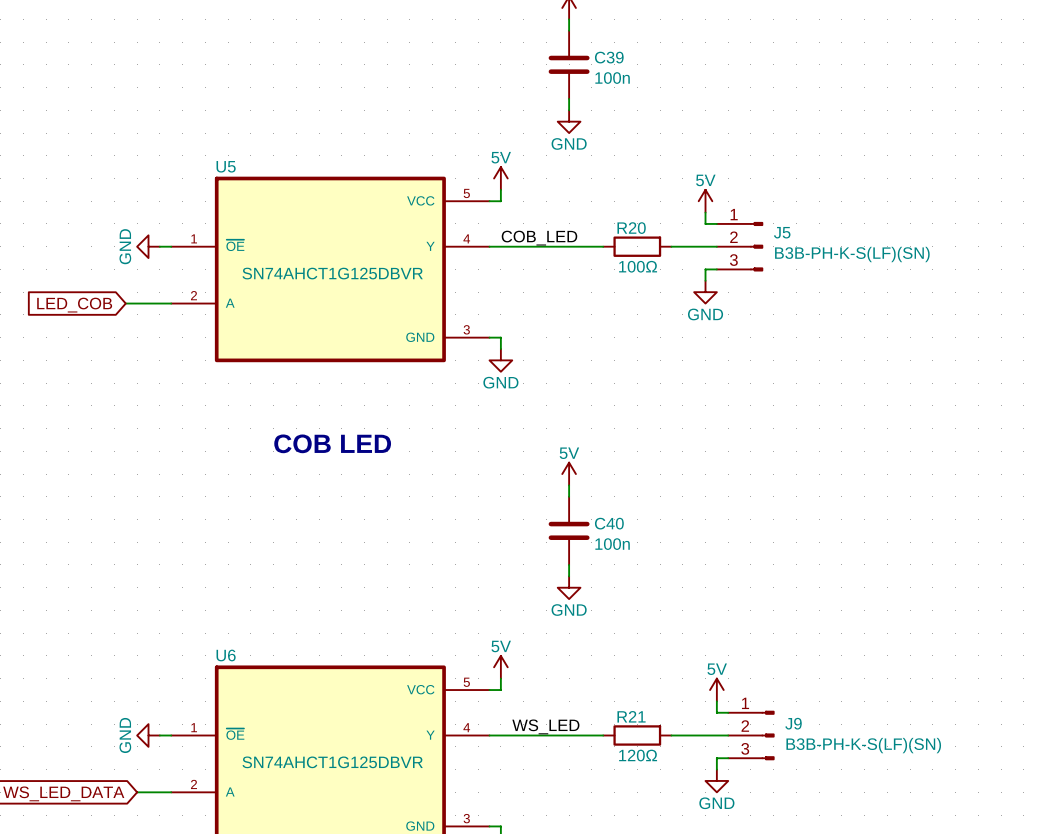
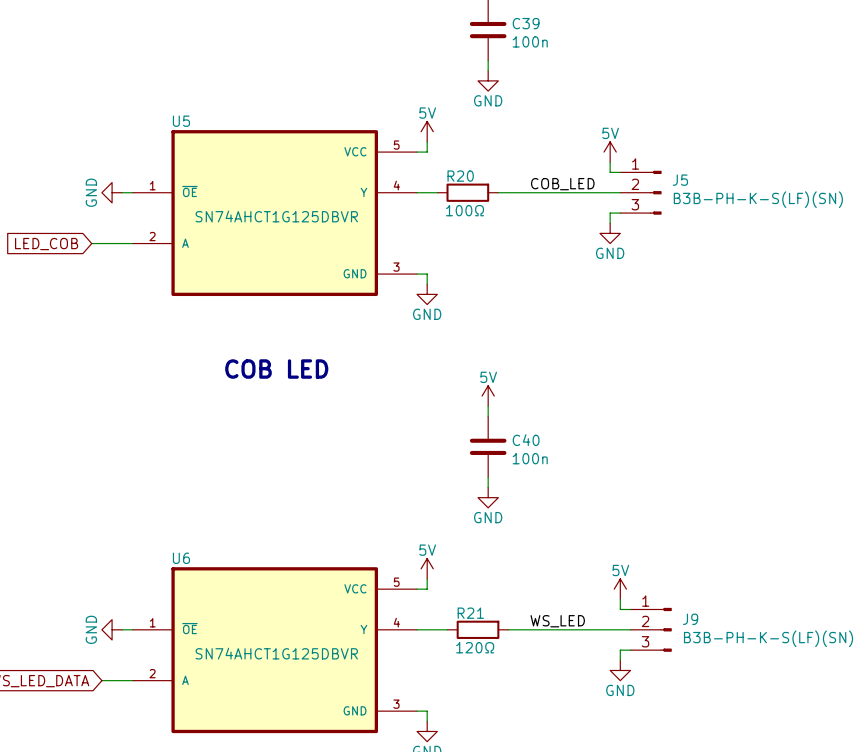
label position: COB_LED (539, 238) -> COB_LED (562, 184)
wire: (512, 246) (580, 246) -> (518, 192) (579, 192)
R20 position: (637, 246) -> (467, 192)
label position: WS_LED (545, 726) -> WS_LED (557, 621)
wire: (523, 735) (591, 735) -> (518, 629) (579, 629)
R21 position: (637, 735) -> (478, 629)

